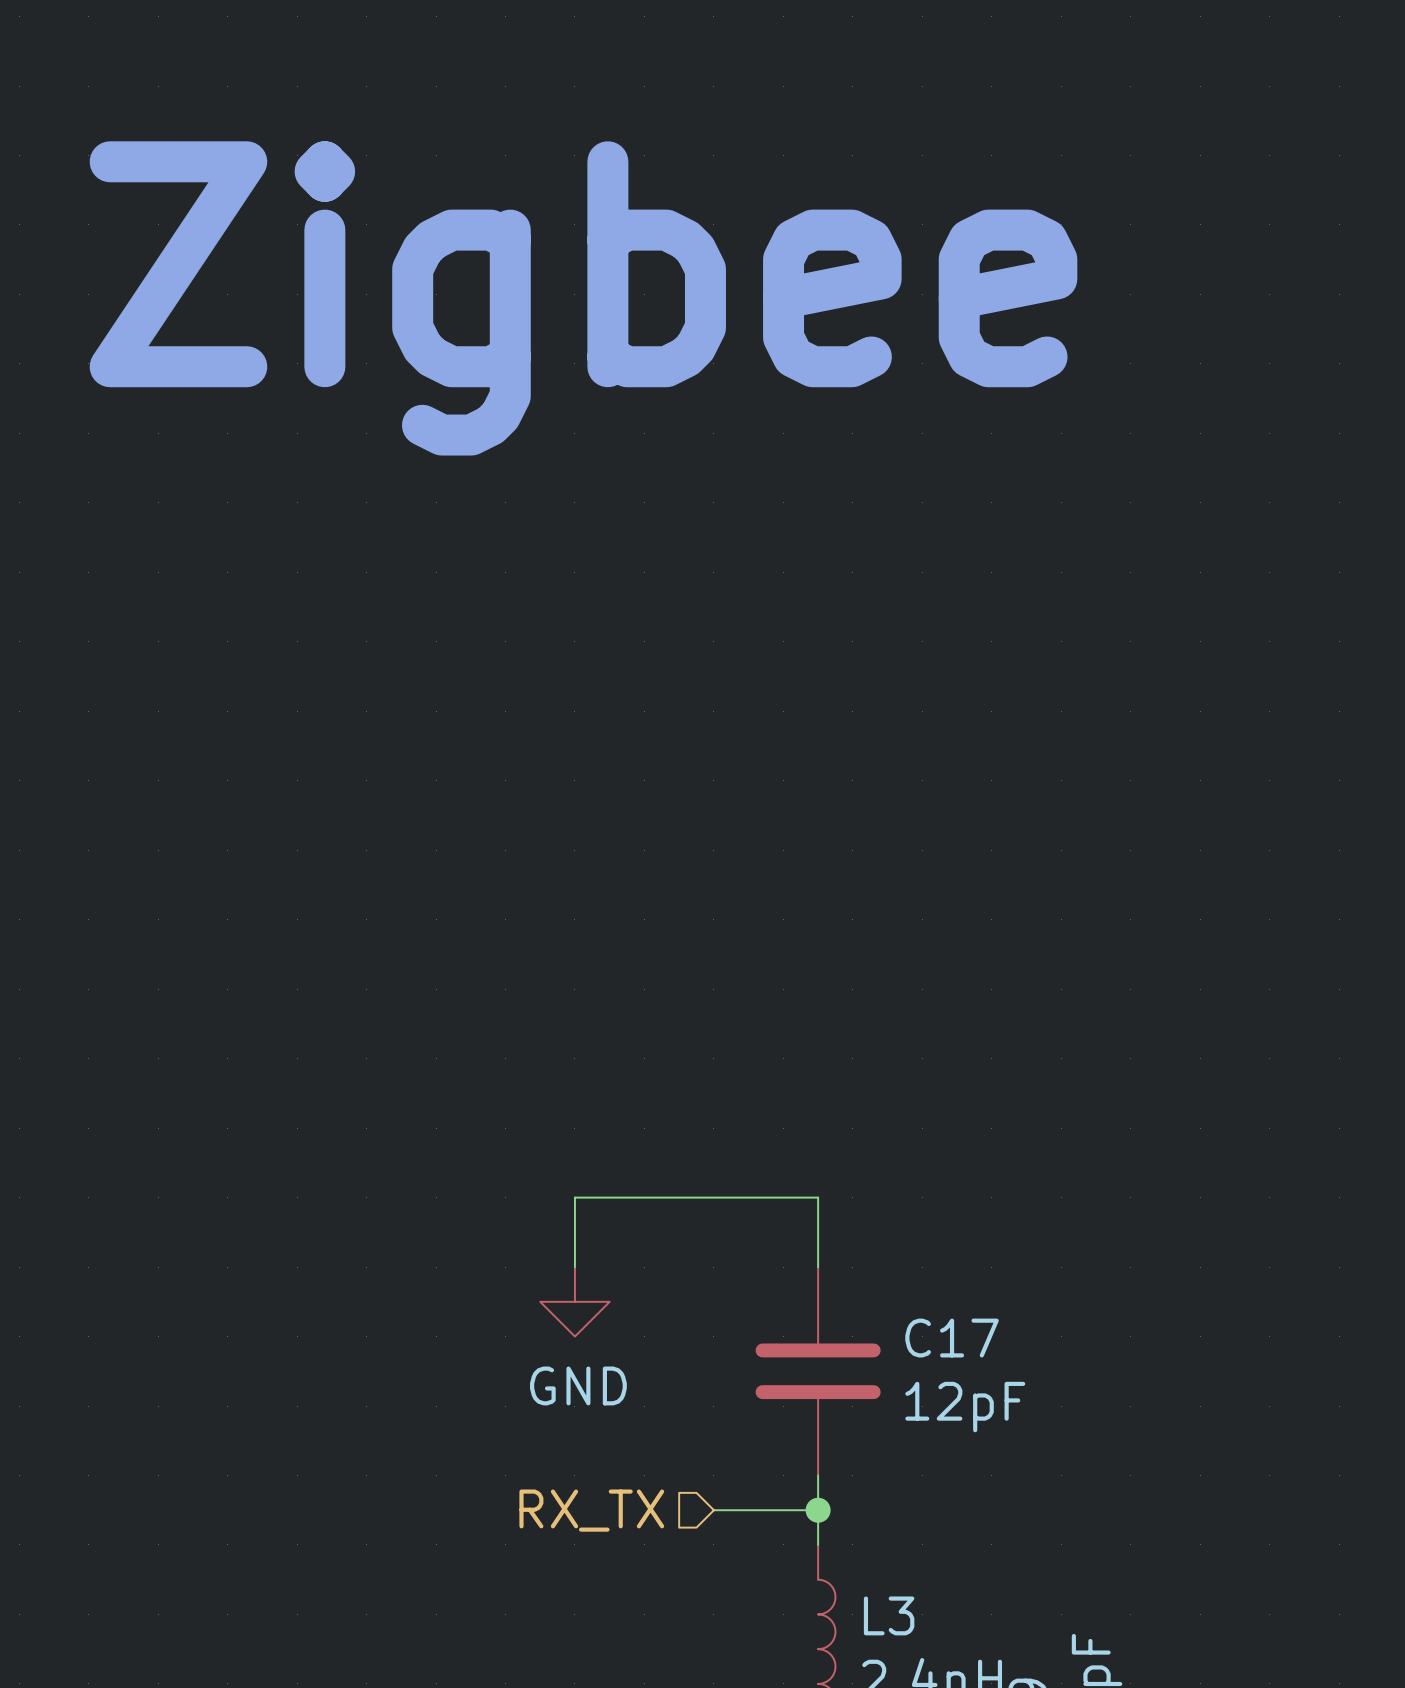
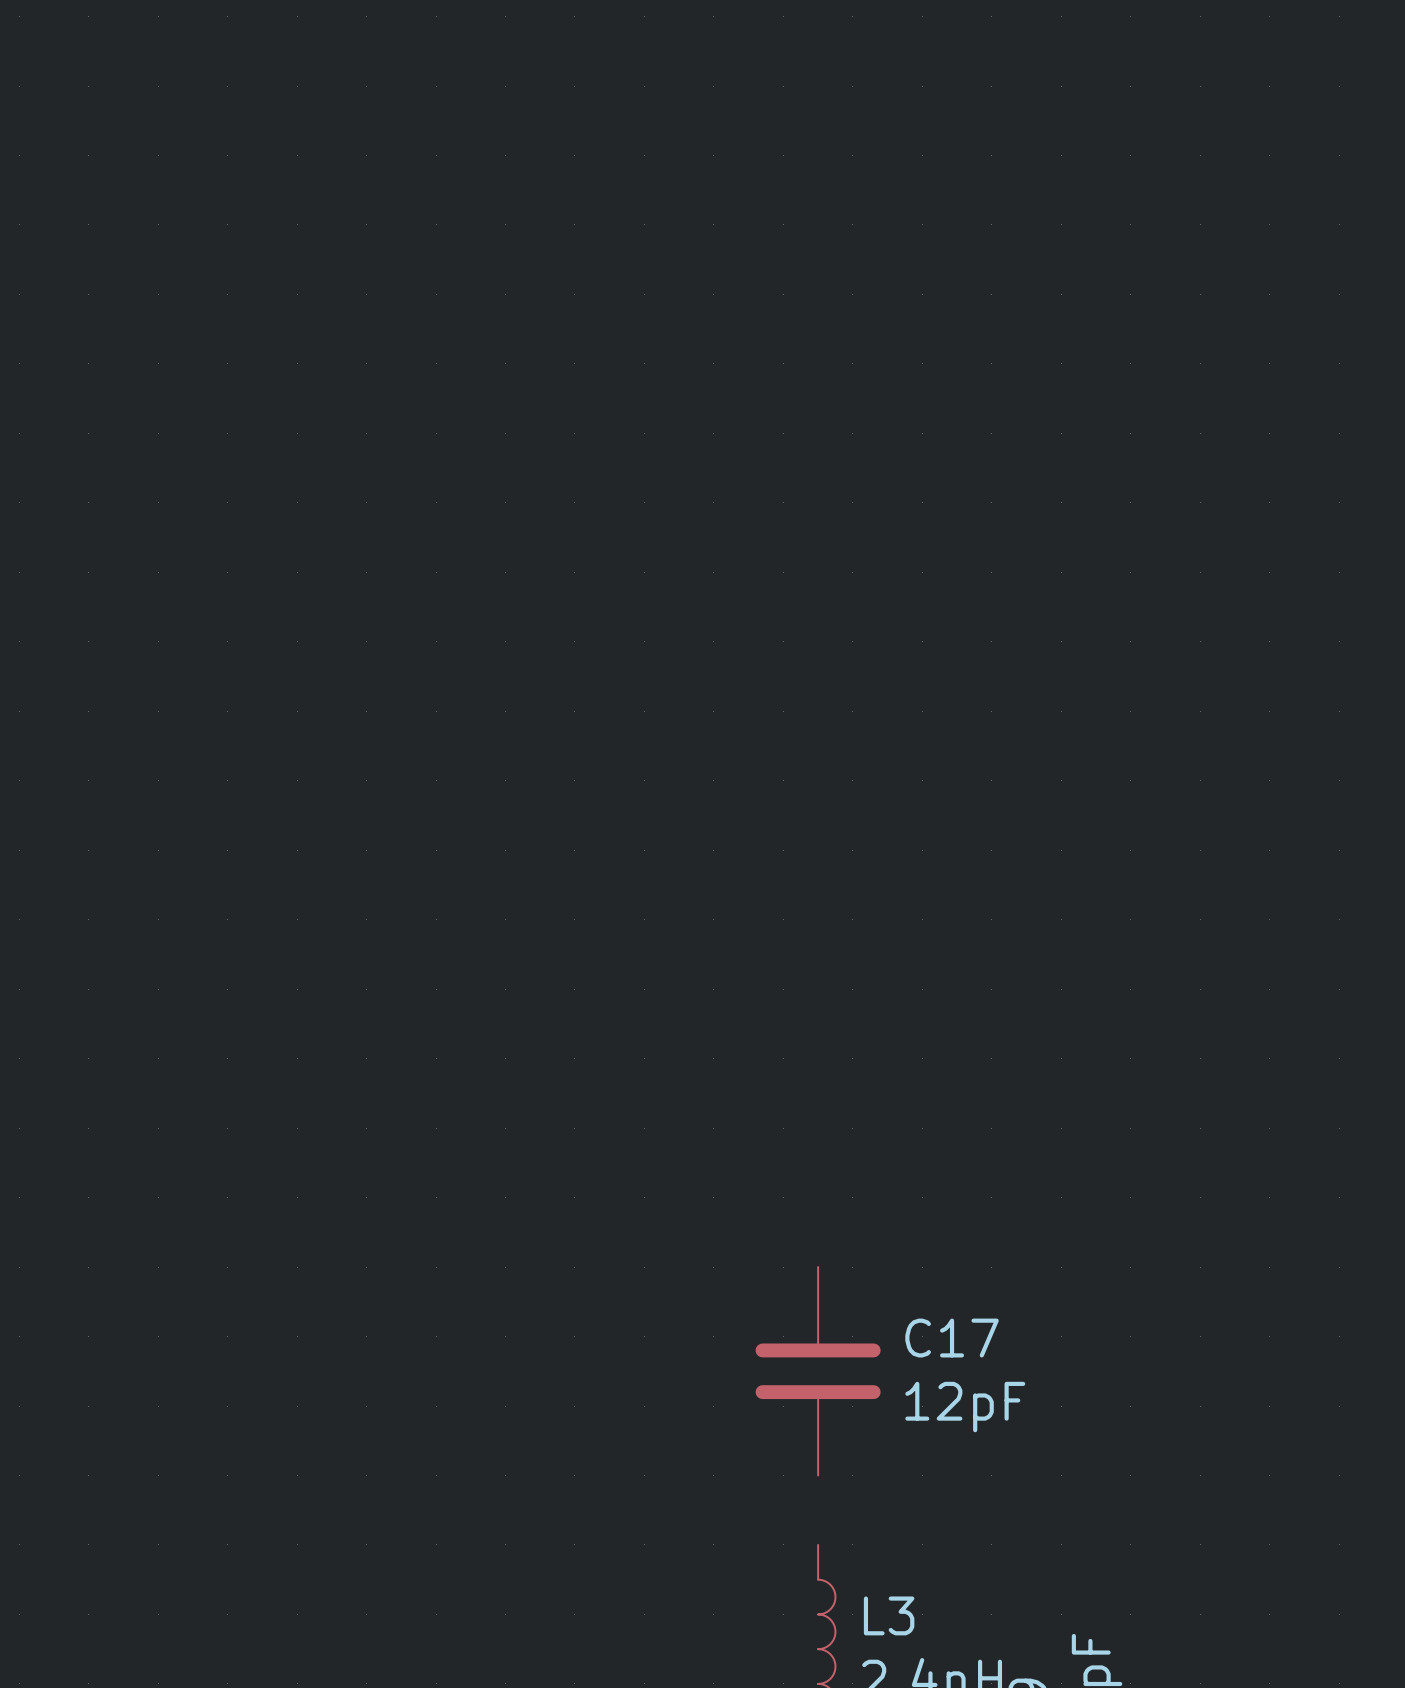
text: Zigbee (583, 298) -> none
wire: (574, 1267) (574, 1197) (818, 1197) (818, 1267) -> none
power symbol: GND (574, 1301) -> none
wire: (818, 1475) (818, 1544) -> none
hierarchical label: RX_TX (591, 1510) -> none
wire: (713, 1510) (818, 1510) -> none
junction: (818, 1510) -> none

